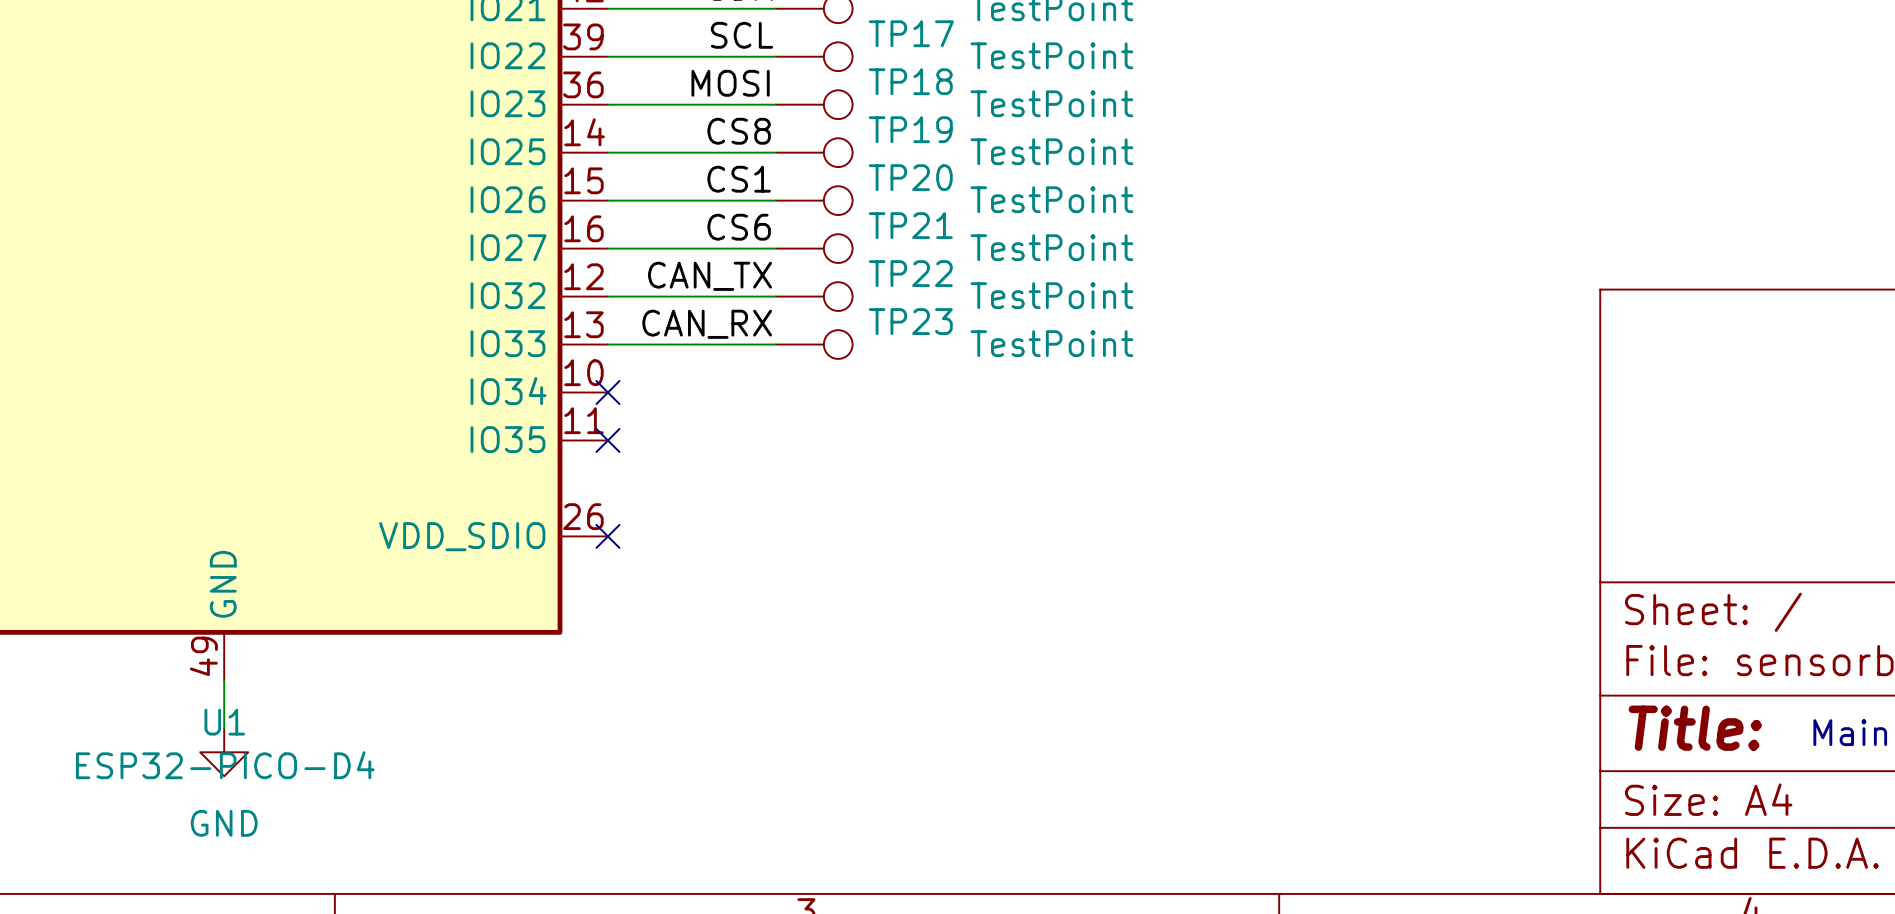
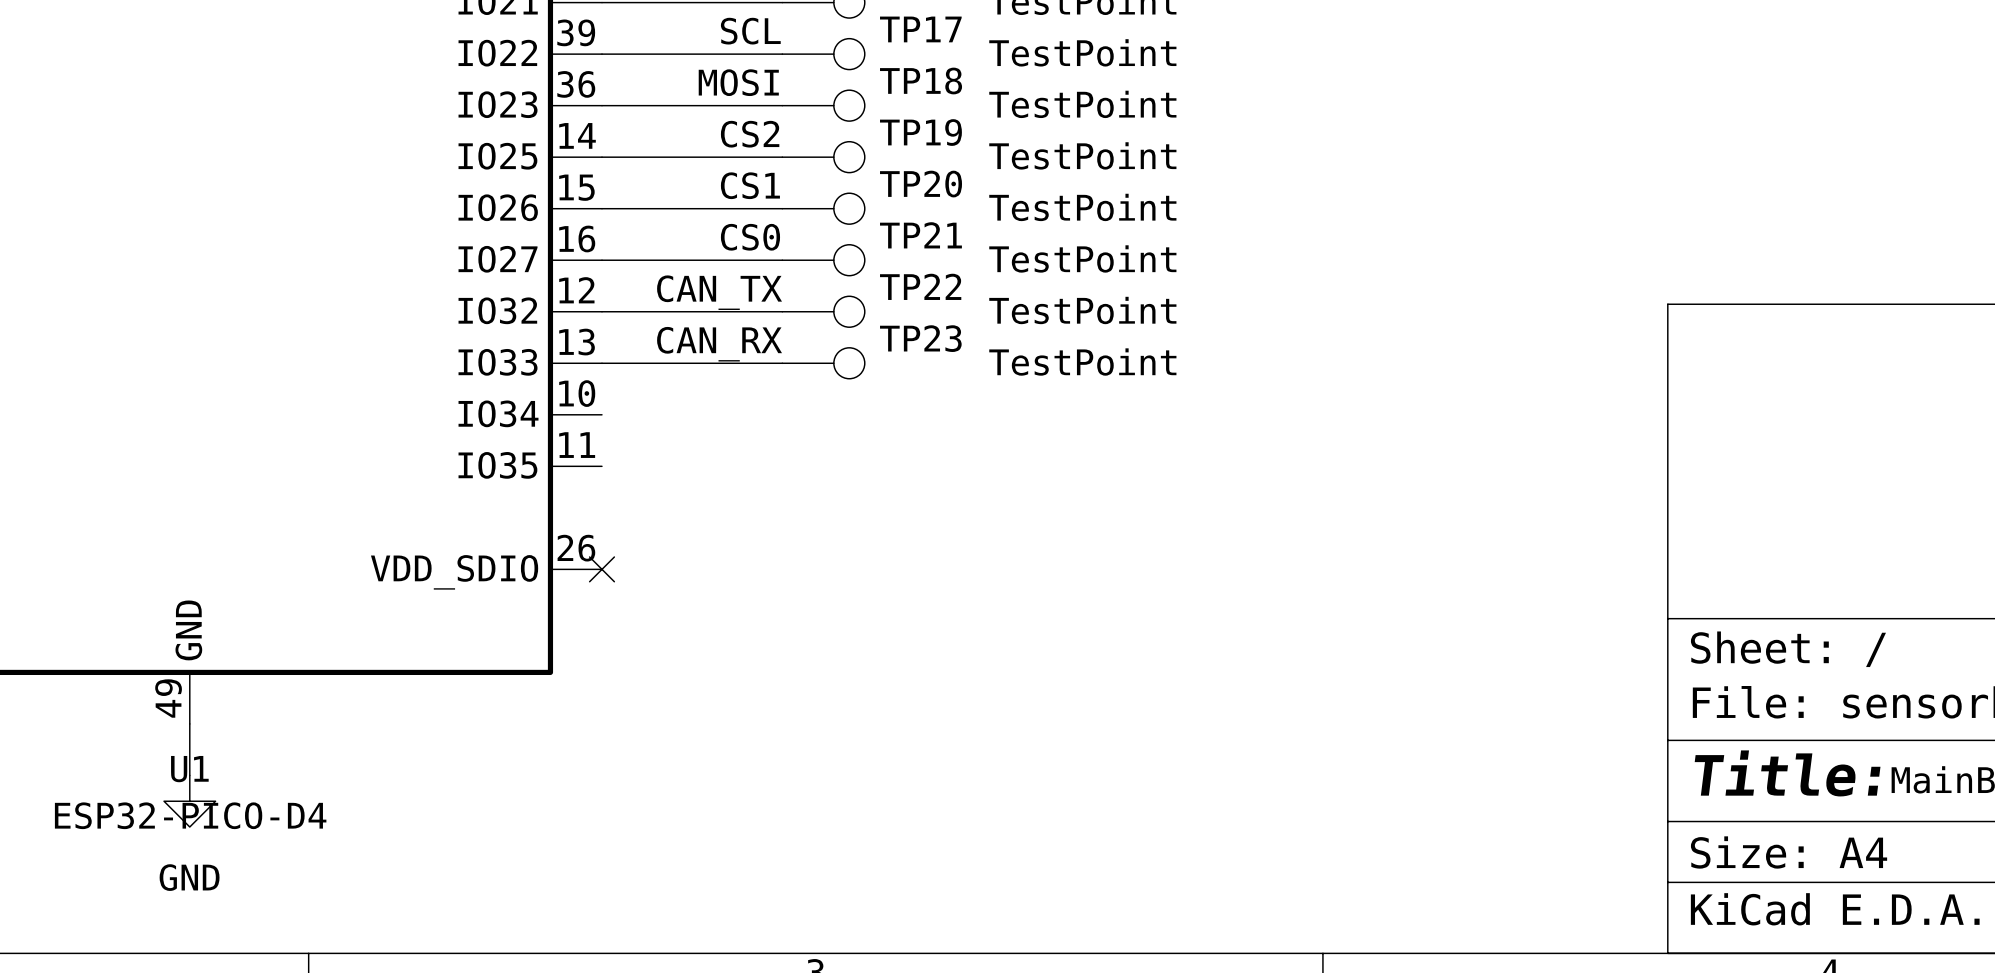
label: CS8 (739, 131) -> CS2 (750, 134)
label: CS6 (739, 227) -> CS0 (750, 237)
no-connect mark: (607, 392) -> none
no-connect mark: (607, 440) -> none

